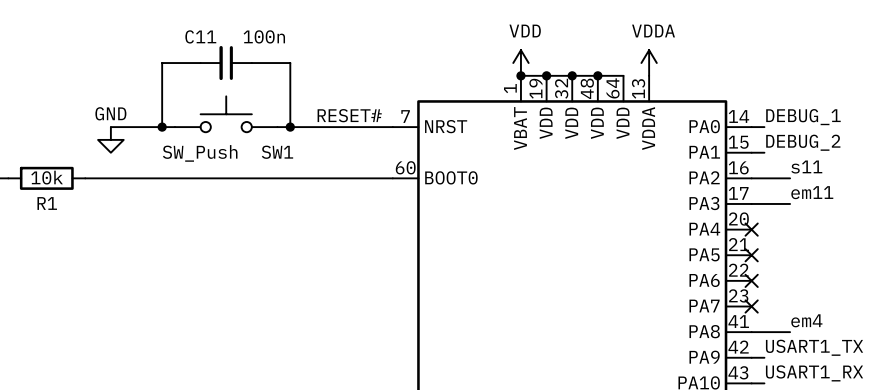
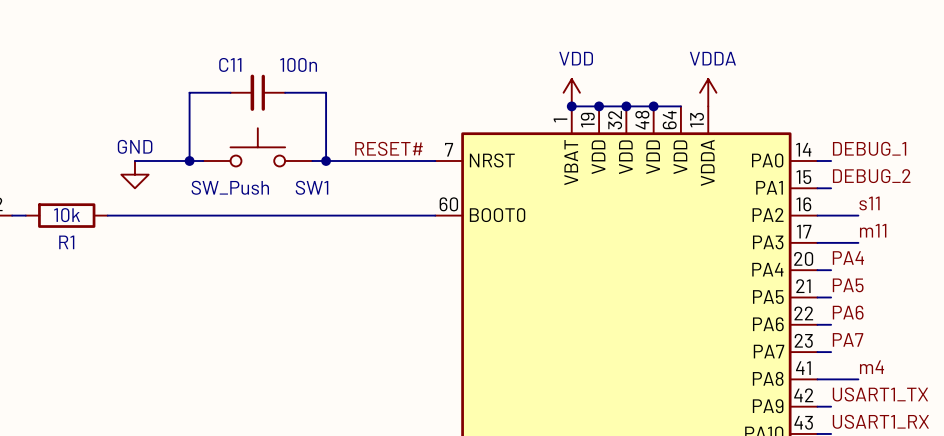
label: em11 (812, 192) -> m11 (873, 230)
label: none -> PA4 (848, 258)
wire: none -> (817, 270) (831, 270)
no-connect mark: (751, 229) -> none
label: none -> PA5 (848, 285)
wire: none -> (817, 297) (831, 297)
no-connect mark: (751, 255) -> none
label: none -> PA6 (848, 312)
wire: none -> (817, 324) (831, 324)
no-connect mark: (751, 280) -> none
label: none -> PA7 (848, 339)
wire: none -> (817, 352) (831, 352)
no-connect mark: (751, 306) -> none
label: em4 (806, 320) -> m4 (872, 367)

